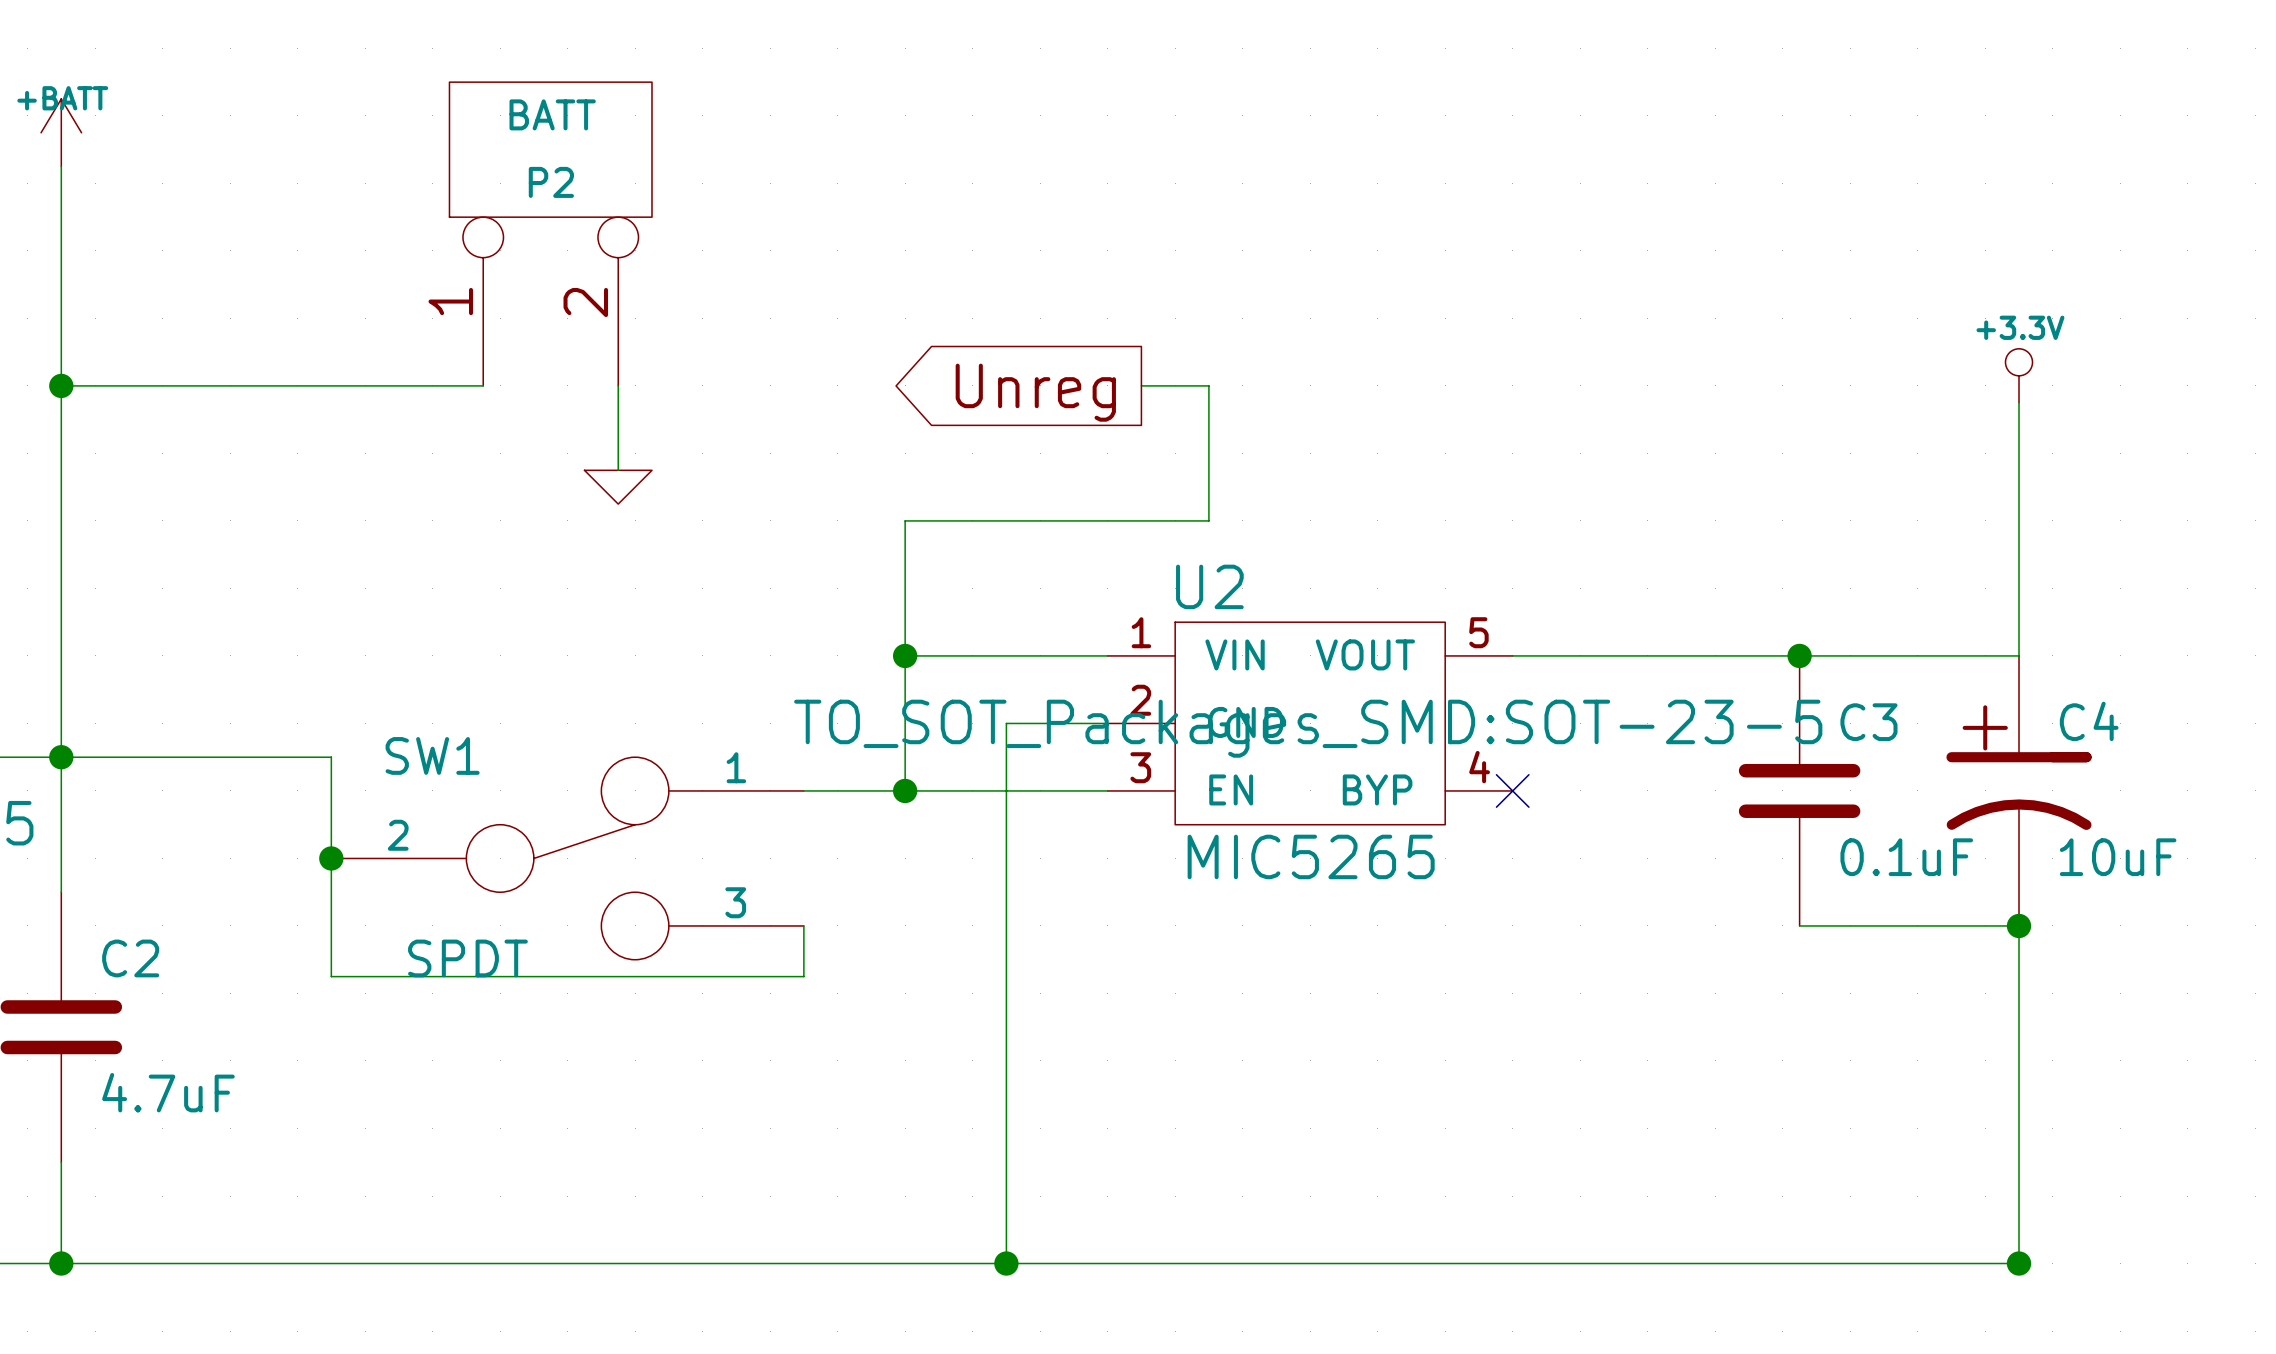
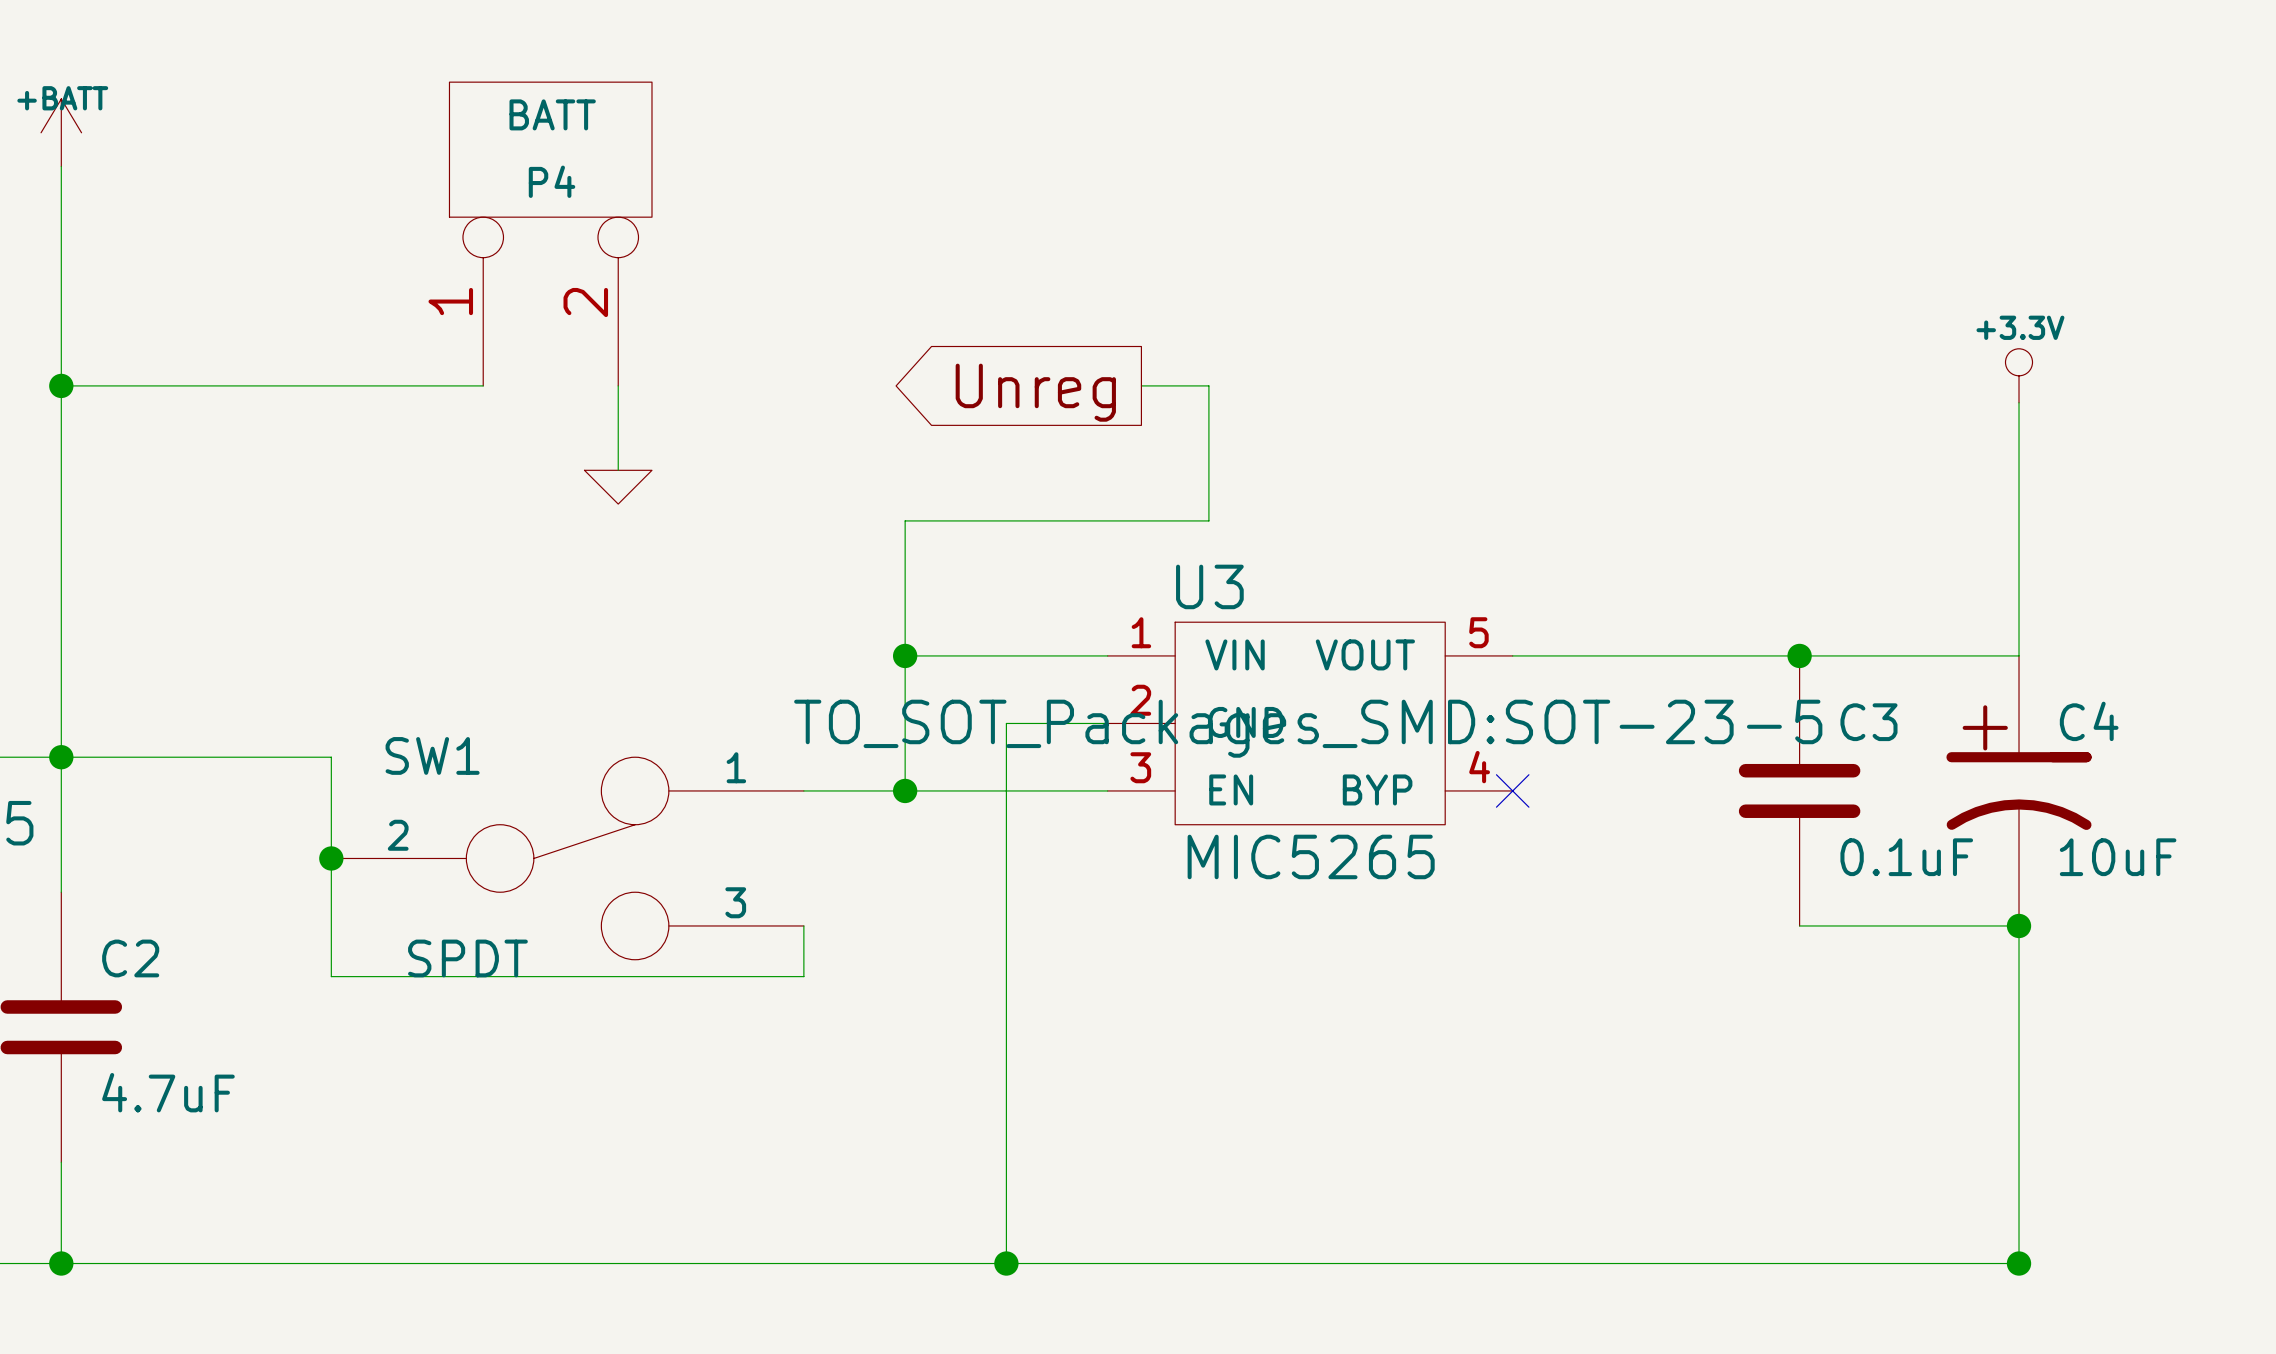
P2 name: P2 (551, 182) -> P4 (552, 181)
U2 name: U2 (1209, 586) -> U3 (1209, 586)

